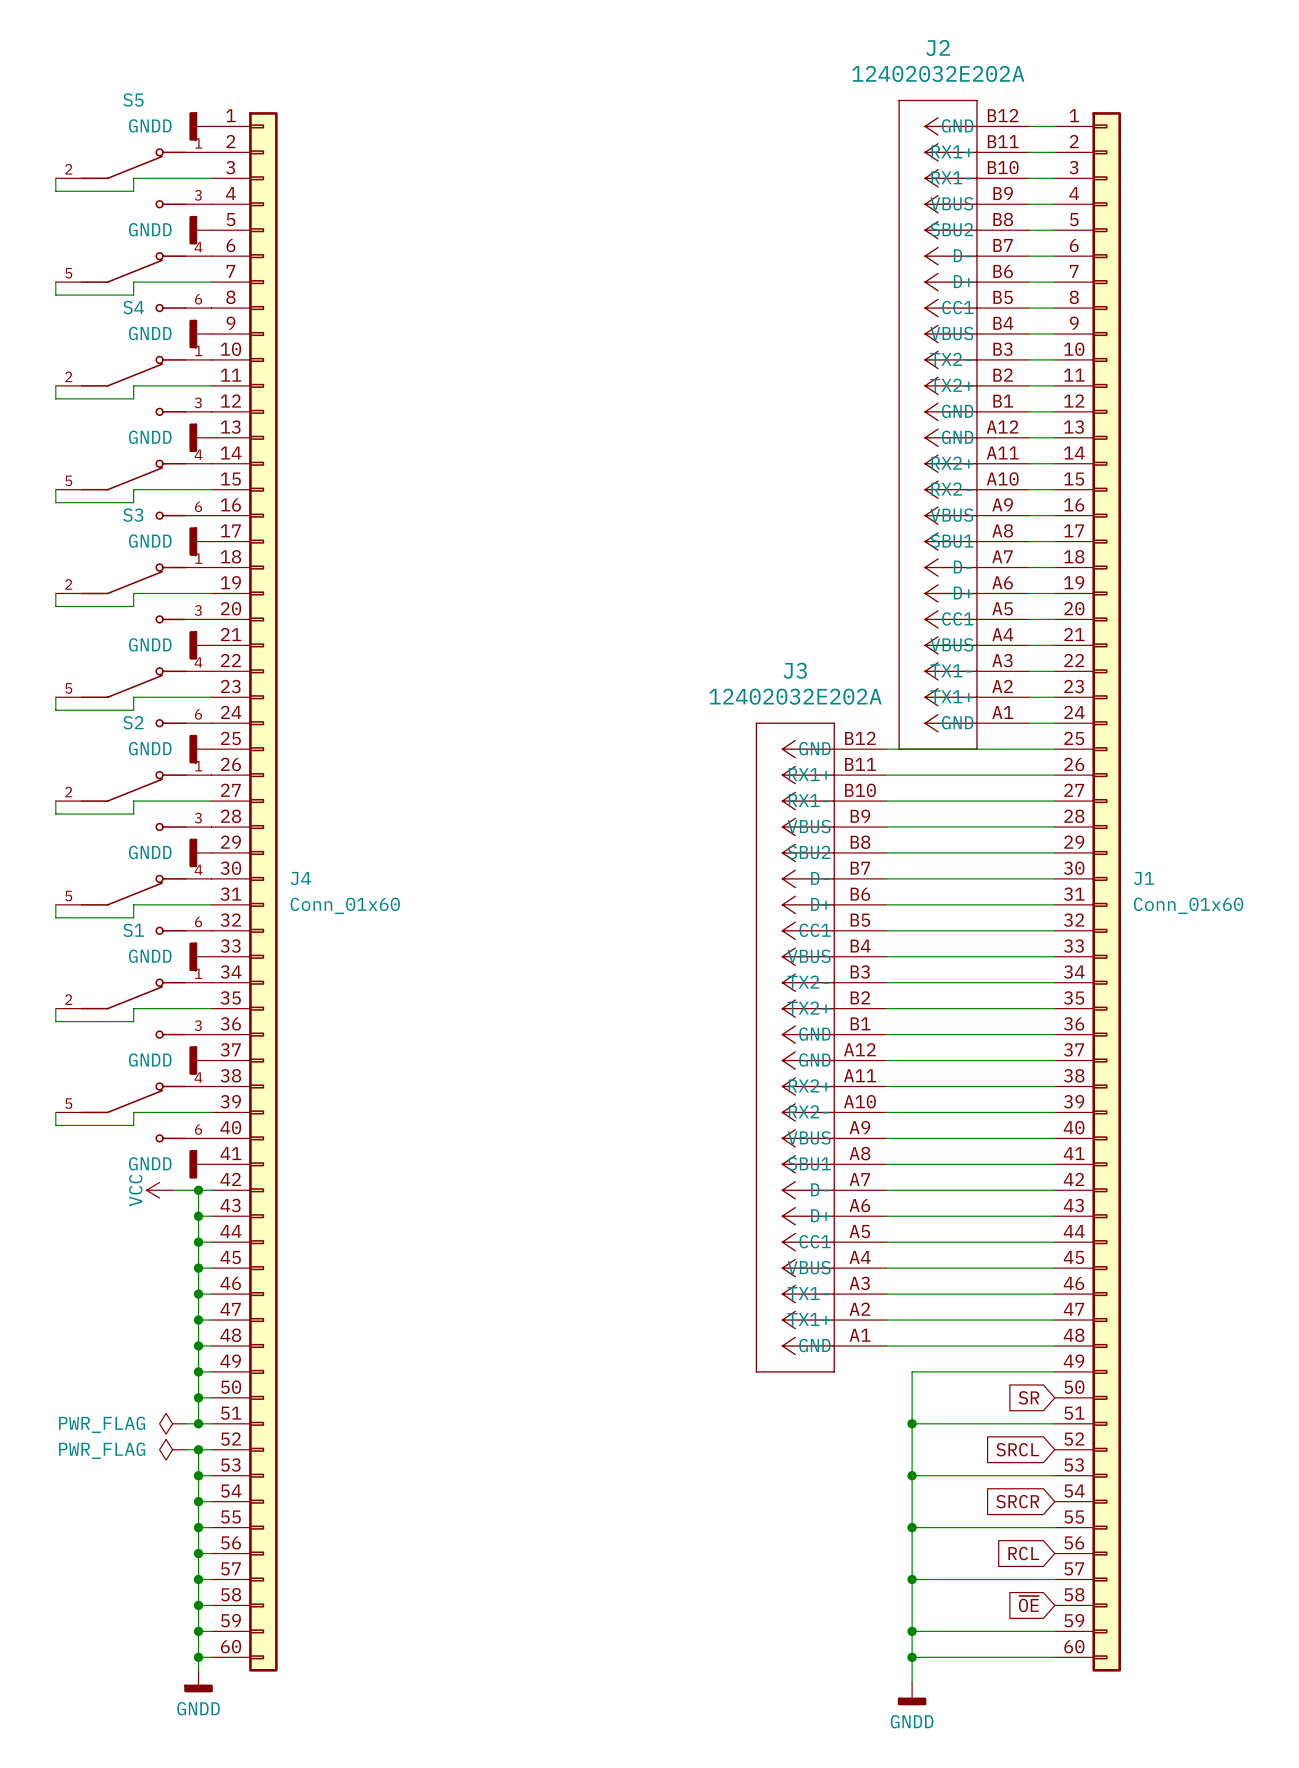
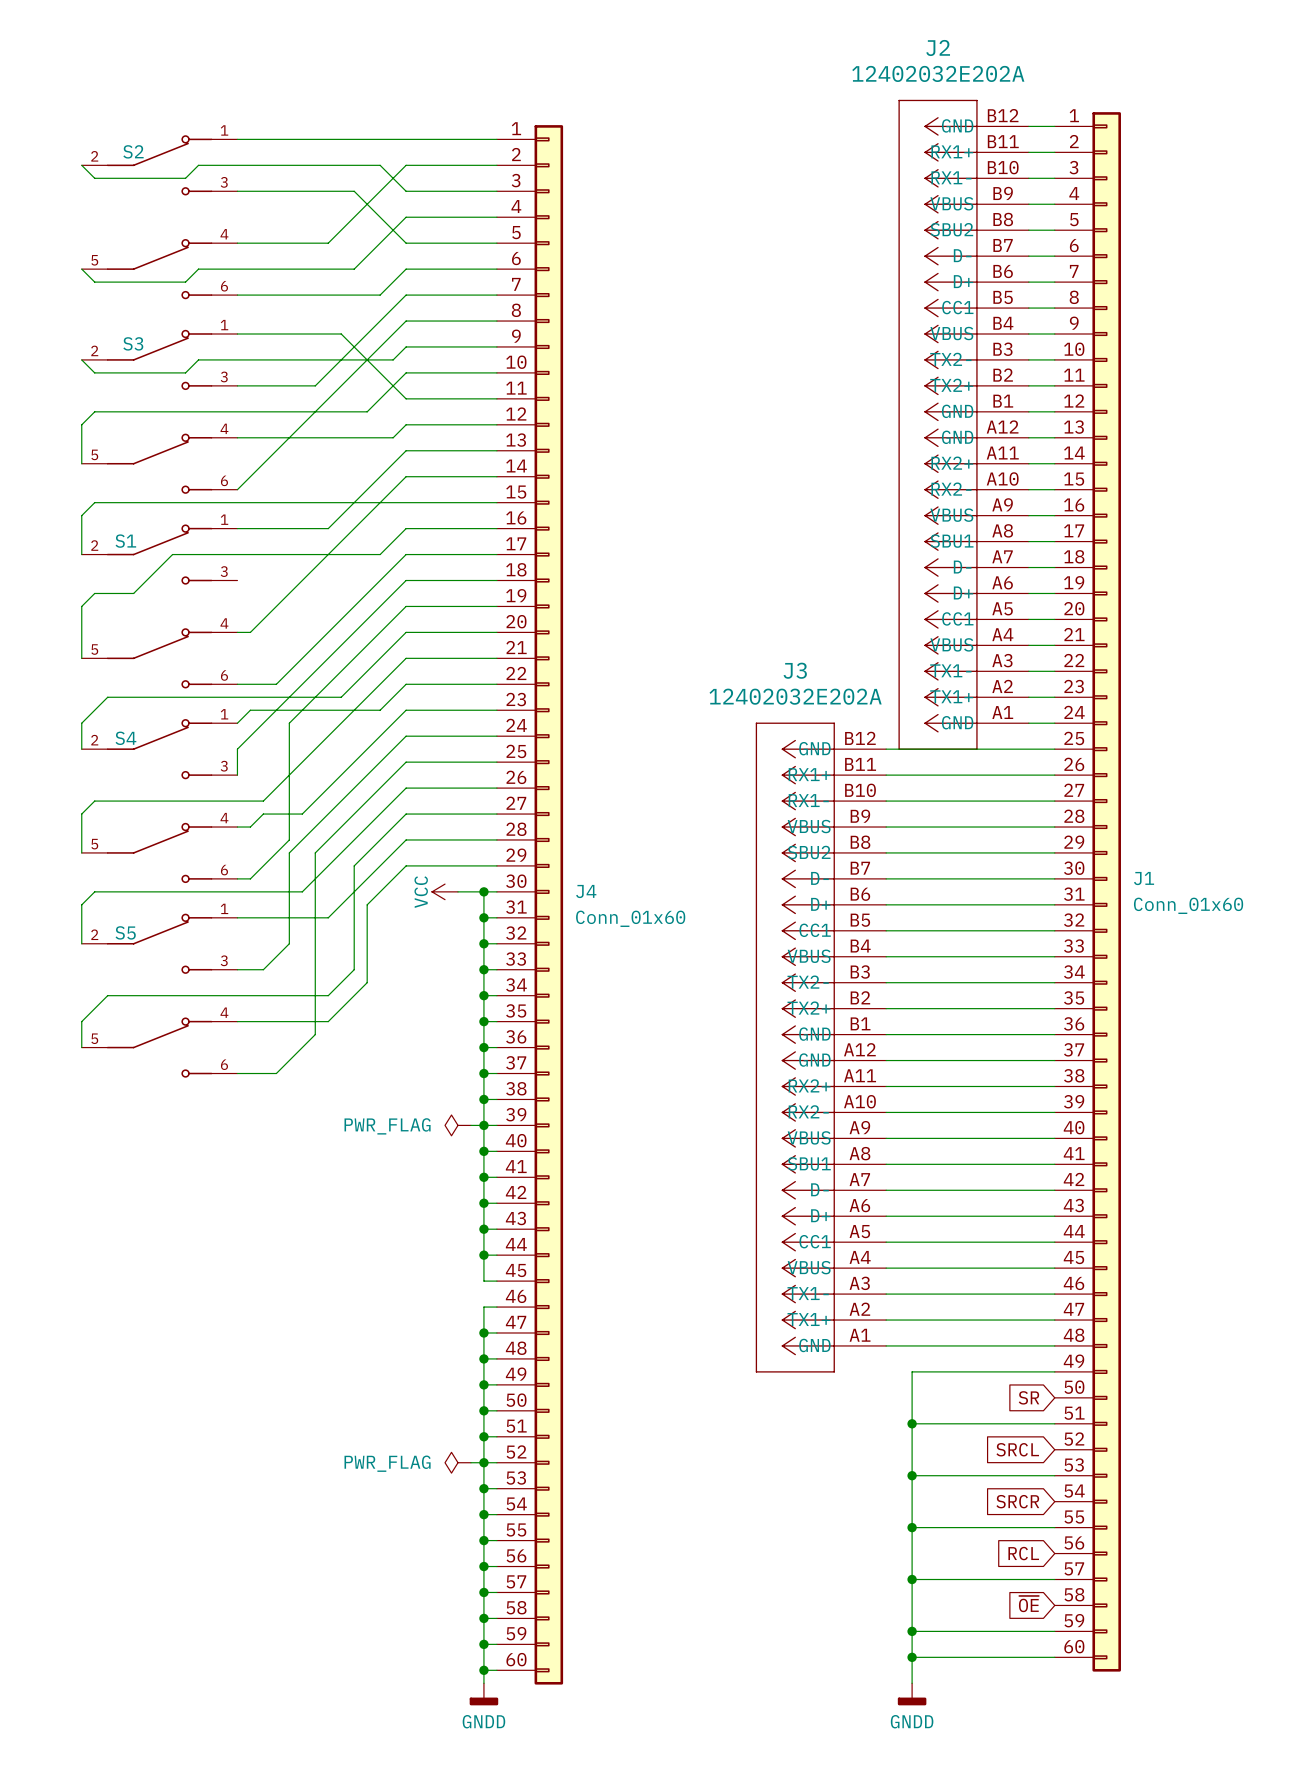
S5 name position: S5 (133, 99) -> S5 (125, 932)
power symbol: GNDD (200, 126) -> none
wire: none -> (237, 139) (496, 139)
wire: none -> (496, 165) (406, 165) (328, 243) (237, 243)
wire: (55, 178) (55, 191) (133, 191) (133, 178) -> (81, 165) (94, 178) (133, 178)
wire: (185, 178) (211, 178) -> (185, 178) (198, 165) (380, 165) (406, 191) (496, 191)
wire: none -> (237, 191) (354, 191) (406, 243) (496, 243)
S5 position: (133, 230) -> (159, 995)
power symbol: GNDD (200, 230) -> none
wire: none -> (496, 269) (406, 269) (380, 295) (237, 295)
wire: (55, 282) (55, 295) (133, 295) (133, 282) -> (81, 269) (94, 282) (133, 282)
wire: (185, 282) (211, 282) -> (185, 282) (198, 269) (354, 269) (406, 217) (496, 217)
wire: none -> (496, 295) (406, 295) (315, 385) (237, 385)
S4 name position: S4 (133, 307) -> S4 (125, 738)
wire: none -> (496, 321) (406, 321) (237, 489)
power symbol: GNDD (200, 333) -> none
wire: none -> (237, 333) (341, 333) (406, 398) (496, 398)
wire: none -> (496, 346) (406, 346) (393, 359) (198, 359) (185, 372) (94, 372) (81, 359)
wire: none -> (496, 372) (406, 372) (367, 411) (94, 411) (81, 424) (81, 463)
wire: (55, 385) (55, 398) (133, 398) (133, 385) (211, 385) -> none
wire: none -> (496, 424) (406, 424) (393, 437) (237, 437)
S4 position: (133, 437) -> (159, 801)
power symbol: GNDD (200, 437) -> none
wire: none -> (496, 450) (406, 450) (328, 528) (237, 528)
wire: none -> (496, 476) (406, 476) (250, 632) (237, 632)
wire: (55, 489) (55, 502) (94, 502) -> (81, 554) (81, 515) (94, 502)
wire: (211, 489) (133, 489) (133, 502) -> (496, 502) (133, 502)
S3 name position: S3 (133, 515) -> S3 (133, 343)
wire: none -> (496, 528) (406, 528) (380, 554) (172, 554) (133, 593) (94, 593) (81, 606) (81, 658)
power symbol: GNDD (200, 541) -> none
wire: none -> (496, 554) (406, 554) (276, 684) (237, 684)
wire: none -> (496, 580) (406, 580) (237, 749) (237, 775)
wire: (55, 593) (55, 606) (133, 606) (133, 593) (211, 593) -> none
wire: none -> (496, 606) (406, 606) (289, 723) (289, 839) (250, 878) (237, 878)
wire: none -> (496, 632) (406, 632) (341, 697) (211, 697)
S3 position: (133, 645) -> (159, 411)
power symbol: GNDD (200, 645) -> none
wire: none -> (496, 658) (406, 658) (263, 801) (211, 801)
wire: none -> (496, 684) (406, 684) (380, 710) (250, 710) (237, 723)
wire: (55, 697) (55, 710) (133, 710) (133, 697) -> (81, 749) (81, 723) (107, 697) (133, 697)
wire: none -> (496, 710) (406, 710) (302, 814) (263, 814) (250, 827) (237, 827)
S2 name position: S2 (133, 722) -> S2 (133, 151)
wire: none -> (496, 736) (406, 736) (289, 852) (289, 943) (263, 969) (237, 969)
power symbol: GNDD (200, 749) -> none
wire: none -> (496, 762) (406, 762) (315, 852) (315, 1034) (276, 1073) (237, 1073)
wire: none -> (496, 788) (406, 788) (302, 891) (94, 891) (81, 904) (81, 943)
wire: (55, 801) (55, 814) (133, 814) (133, 801) -> (81, 852) (81, 814) (94, 801) (133, 801)
wire: none -> (496, 814) (406, 814) (354, 865) (354, 969) (328, 995) (107, 995) (81, 1021) (81, 1047)
wire: none -> (496, 839) (406, 839) (328, 917) (237, 917)
S2 position: (133, 852) -> (159, 217)
power symbol: GNDD (200, 852) -> none
wire: none -> (496, 865) (406, 865) (367, 904) (367, 982) (328, 1021) (237, 1021)
J4 position: (244, 891) -> (530, 904)
power symbol: none -> VCC (445, 891)
wire: none -> (458, 891) (496, 891)
wire: none -> (483, 891) (483, 1281) (496, 1281)
junction: none -> (483, 891)
wire: (55, 904) (55, 917) (133, 917) (133, 904) (211, 904) -> none
wire: none -> (483, 917) (496, 917)
junction: none -> (483, 917)
S1 name position: S1 (133, 930) -> S1 (125, 541)
wire: none -> (483, 943) (496, 943)
junction: none -> (483, 943)
power symbol: GNDD (200, 956) -> none
wire: none -> (483, 969) (496, 969)
junction: none -> (483, 969)
wire: none -> (483, 995) (496, 995)
junction: none -> (483, 995)
wire: (55, 1008) (55, 1021) (133, 1021) (133, 1008) (211, 1008) -> none
wire: none -> (483, 1021) (496, 1021)
junction: none -> (483, 1021)
wire: none -> (483, 1047) (496, 1047)
junction: none -> (483, 1047)
S1 position: (133, 1060) -> (159, 606)
power symbol: GNDD (200, 1060) -> none
wire: none -> (483, 1073) (496, 1073)
junction: none -> (483, 1073)
wire: none -> (483, 1099) (496, 1099)
junction: none -> (483, 1099)
wire: (55, 1112) (55, 1125) (133, 1125) (133, 1112) (211, 1112) -> none
power symbol: none -> PWR_FLAG (458, 1125)
wire: none -> (470, 1125) (496, 1125)
junction: none -> (483, 1125)
wire: none -> (483, 1151) (496, 1151)
junction: none -> (483, 1151)
power symbol: GNDD (200, 1164) -> none
wire: none -> (483, 1177) (496, 1177)
junction: none -> (483, 1177)
power symbol: VCC (159, 1190) -> none
wire: (172, 1190) (211, 1190) -> none
wire: (198, 1190) (198, 1423) -> none
junction: (198, 1190) -> none
wire: none -> (483, 1203) (496, 1203)
junction: none -> (483, 1203)
wire: (198, 1216) (211, 1216) -> none
junction: (198, 1216) -> none
wire: none -> (483, 1229) (496, 1229)
junction: none -> (483, 1229)
wire: (198, 1242) (211, 1242) -> none
junction: (198, 1242) -> none
wire: none -> (483, 1255) (496, 1255)
junction: none -> (483, 1255)
wire: (198, 1268) (211, 1268) -> none
junction: (198, 1268) -> none
wire: (198, 1294) (211, 1294) -> none
junction: (198, 1294) -> none
wire: none -> (496, 1307) (483, 1307) (483, 1683)
wire: (198, 1320) (211, 1320) -> none
junction: (198, 1320) -> none
wire: none -> (483, 1332) (496, 1332)
junction: none -> (483, 1332)
wire: (198, 1345) (211, 1345) -> none
junction: (198, 1345) -> none
wire: none -> (483, 1358) (496, 1358)
junction: none -> (483, 1358)
wire: (198, 1371) (211, 1371) -> none
junction: (198, 1371) -> none
wire: none -> (483, 1384) (496, 1384)
junction: none -> (483, 1384)
wire: (198, 1397) (211, 1397) -> none
junction: (198, 1397) -> none
wire: none -> (483, 1410) (496, 1410)
junction: none -> (483, 1410)
power symbol: PWR_FLAG (172, 1423) -> none
wire: (185, 1423) (211, 1423) -> none
junction: (198, 1423) -> none
wire: none -> (483, 1436) (496, 1436)
junction: none -> (483, 1436)
power symbol: PWR_FLAG (172, 1449) -> none
wire: (185, 1449) (211, 1449) -> none
wire: (198, 1449) (198, 1670) -> none
junction: (198, 1449) -> none
power symbol: none -> PWR_FLAG (458, 1462)
wire: none -> (470, 1462) (496, 1462)
junction: none -> (483, 1462)
wire: (198, 1475) (211, 1475) -> none
junction: (198, 1475) -> none
wire: none -> (483, 1488) (496, 1488)
junction: none -> (483, 1488)
wire: (198, 1501) (211, 1501) -> none
junction: (198, 1501) -> none
wire: none -> (483, 1514) (496, 1514)
junction: none -> (483, 1514)
wire: (198, 1527) (211, 1527) -> none
junction: (198, 1527) -> none
wire: none -> (483, 1540) (496, 1540)
junction: none -> (483, 1540)
wire: (198, 1553) (211, 1553) -> none
junction: (198, 1553) -> none
wire: none -> (483, 1566) (496, 1566)
junction: none -> (483, 1566)
wire: (198, 1579) (211, 1579) -> none
junction: (198, 1579) -> none
wire: none -> (483, 1592) (496, 1592)
junction: none -> (483, 1592)
wire: (198, 1605) (211, 1605) -> none
junction: (198, 1605) -> none
wire: none -> (483, 1618) (496, 1618)
junction: none -> (483, 1618)
wire: (198, 1631) (211, 1631) -> none
junction: (198, 1631) -> none
wire: none -> (483, 1644) (496, 1644)
junction: none -> (483, 1644)
wire: (198, 1657) (211, 1657) -> none
junction: (198, 1657) -> none
wire: none -> (483, 1670) (496, 1670)
junction: none -> (483, 1670)
power symbol: GNDD (198, 1681) -> none
power symbol: none -> GNDD (483, 1694)

